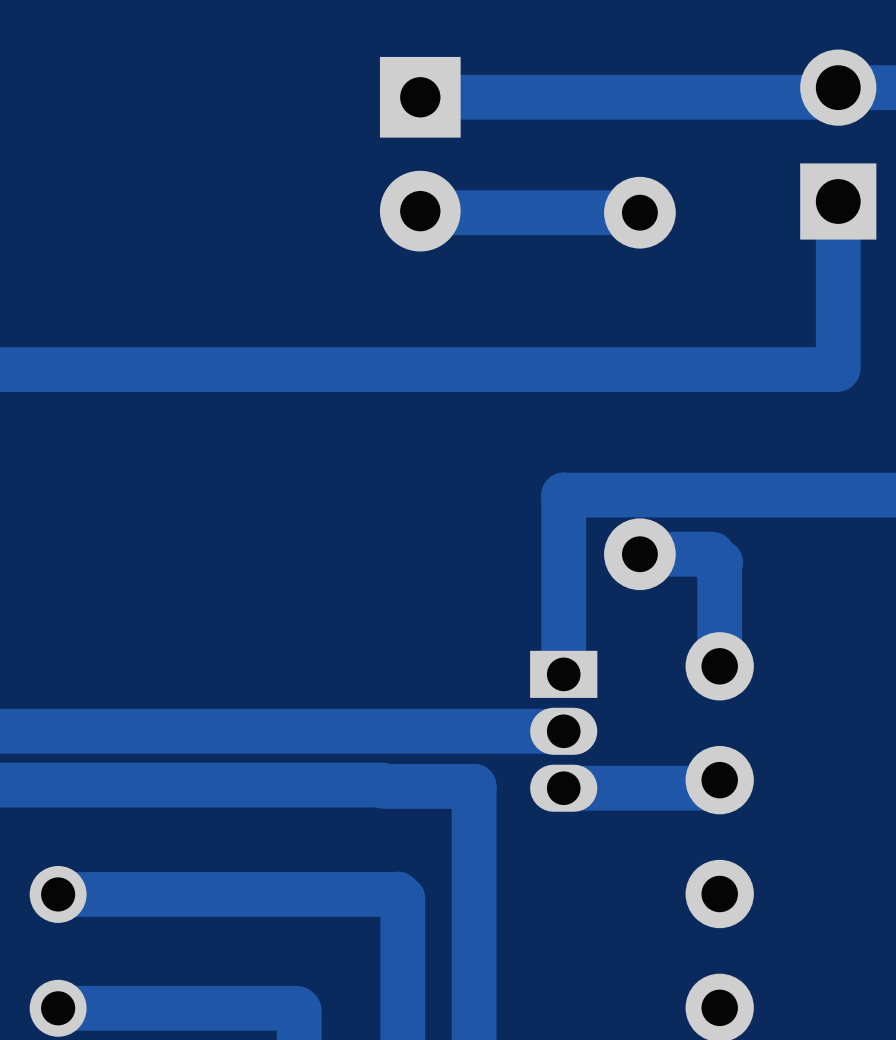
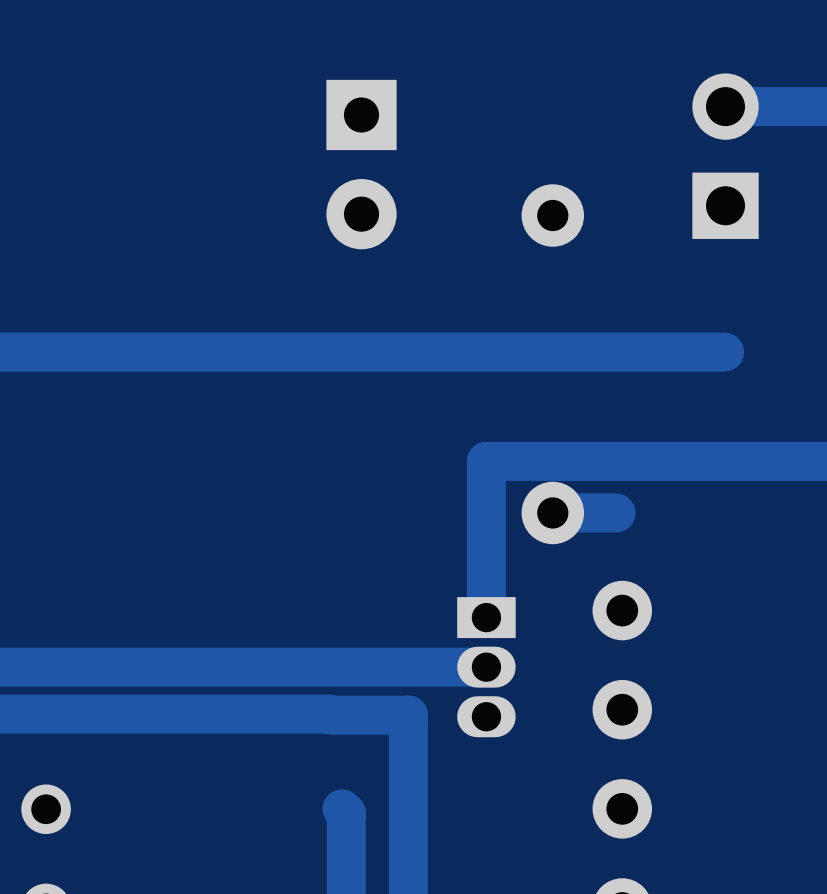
track: (828, 97) (420, 97) -> none
track: (838, 201) (838, 368) -> none
track: (639, 212) (421, 212) -> none
track: (720, 562) (719, 666) -> none
track: (711, 788) (563, 788) -> none
track: (397, 894) (58, 894) -> none

